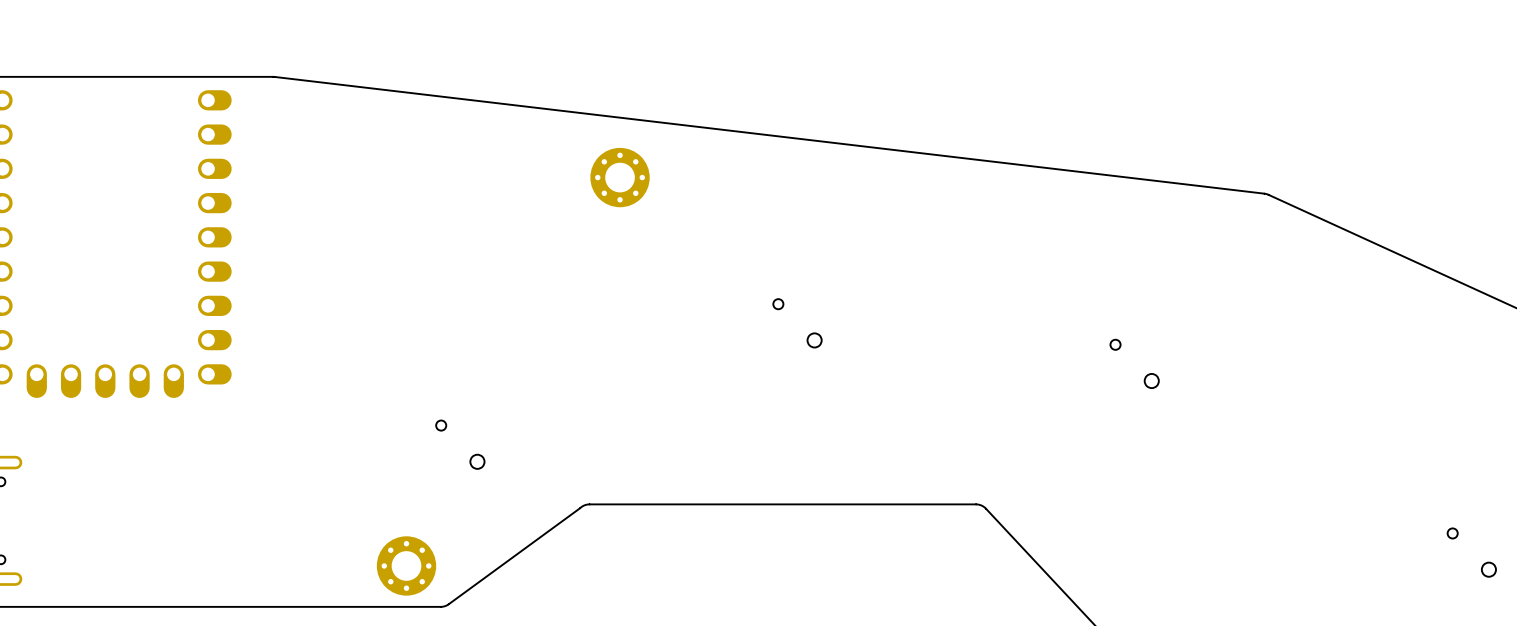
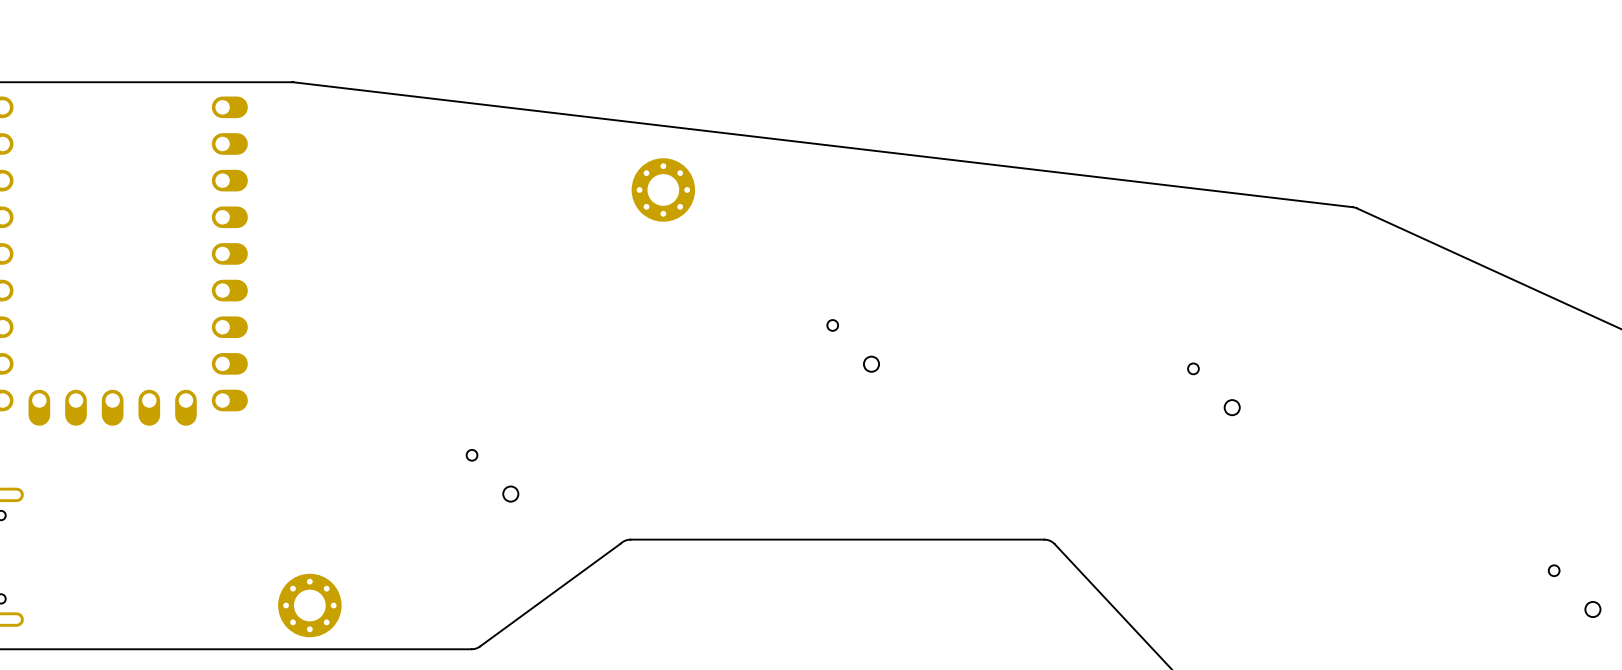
part position: (406, 565) -> (309, 605)

